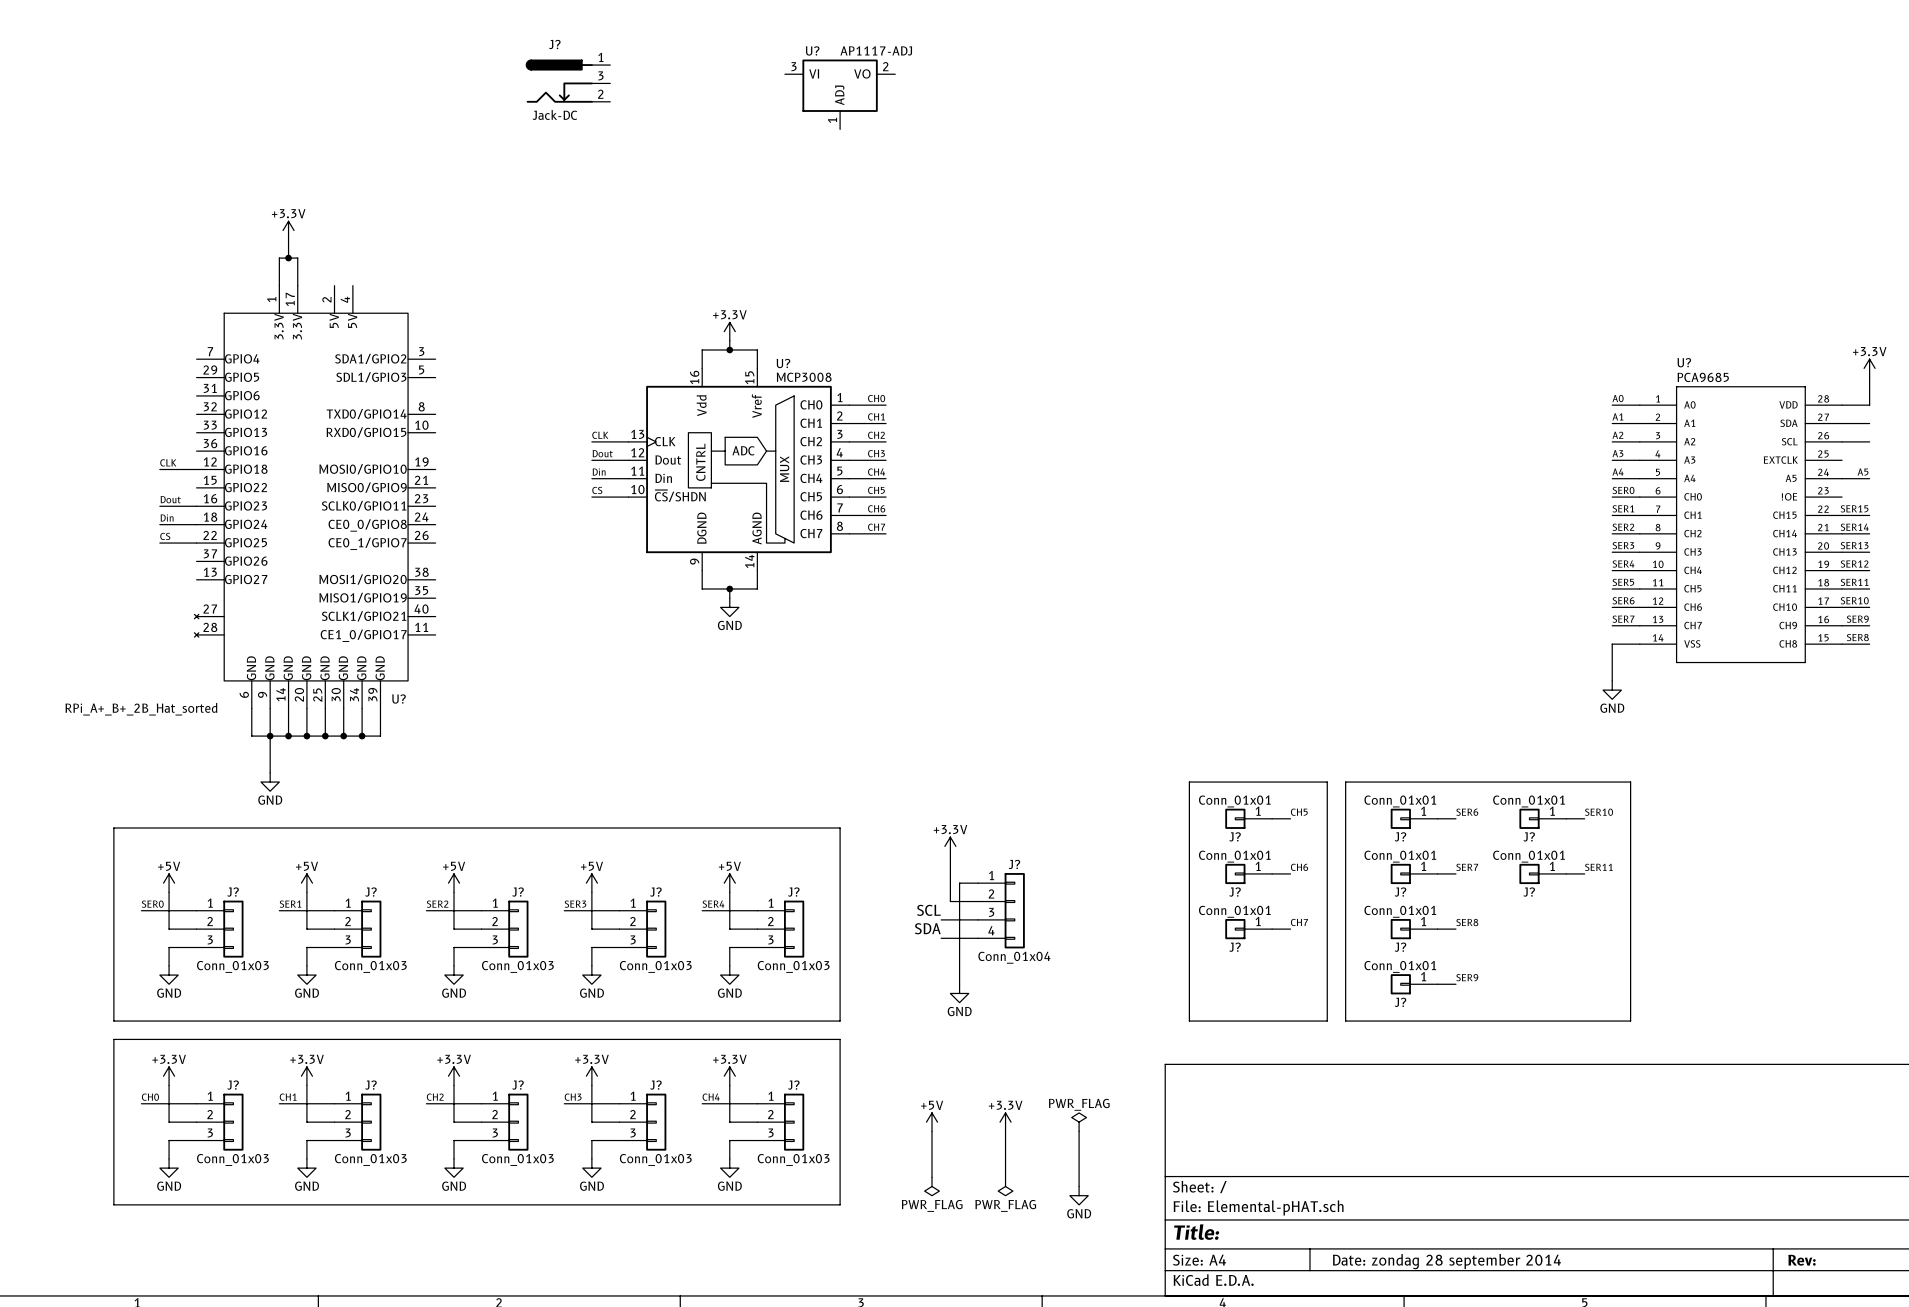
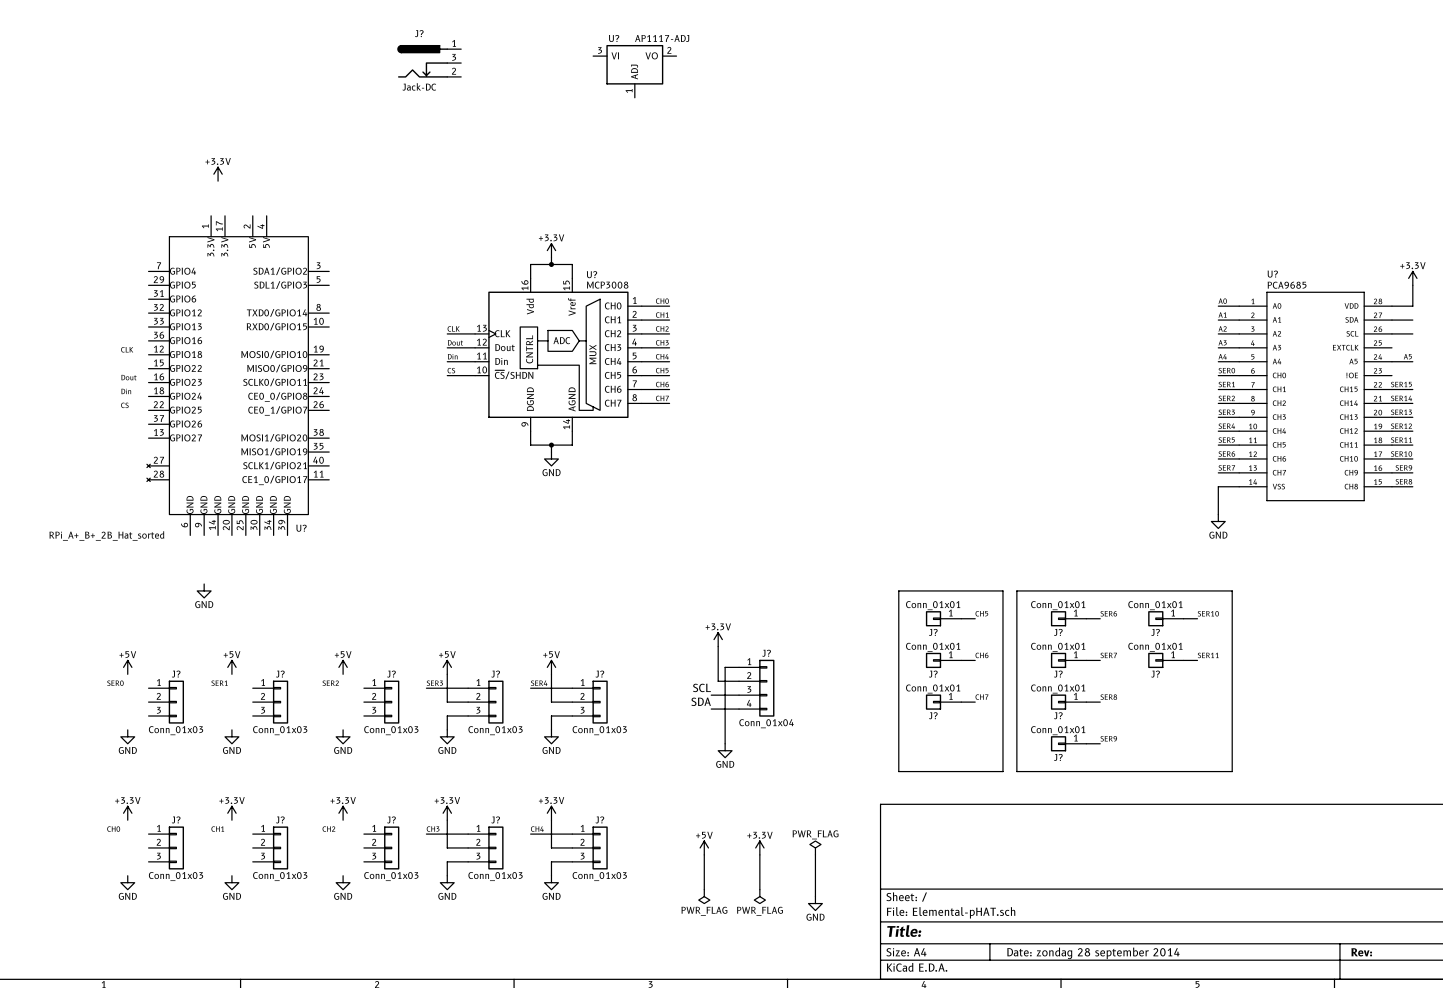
wire: (288, 239) (288, 258) -> none
junction: (288, 258) -> none
wire: (279, 285) (279, 258) (297, 258) (297, 285) -> none
wire: (159, 469) (196, 469) -> none
wire: (159, 506) (196, 506) -> none
wire: (159, 524) (196, 524) -> none
wire: (159, 543) (196, 543) -> none
wire: (251, 708) (251, 736) (380, 736) (380, 708) -> none
wire: (270, 708) (270, 772) -> none
wire: (288, 708) (288, 736) -> none
wire: (306, 708) (306, 736) -> none
wire: (325, 708) (325, 736) -> none
wire: (343, 708) (343, 736) -> none
wire: (362, 708) (362, 736) -> none
junction: (270, 736) -> none
junction: (288, 736) -> none
junction: (306, 736) -> none
junction: (325, 736) -> none
junction: (343, 736) -> none
junction: (362, 736) -> none
bus: (113, 827) (113, 1021) (840, 1021) (840, 827) (113, 827) -> none
wire: (169, 892) (169, 929) (196, 929) -> none
wire: (306, 892) (306, 929) (334, 929) -> none
wire: (454, 892) (454, 929) (481, 929) -> none
wire: (141, 910) (196, 910) -> none
wire: (279, 910) (334, 910) -> none
wire: (426, 910) (481, 910) -> none
wire: (196, 947) (169, 947) (169, 965) -> none
wire: (334, 947) (306, 947) (306, 965) -> none
wire: (481, 947) (454, 947) (454, 965) -> none
bus: (113, 1039) (113, 1204) (840, 1204) (840, 1039) (113, 1039) -> none
wire: (169, 1085) (169, 1122) (196, 1122) -> none
wire: (306, 1085) (306, 1122) (334, 1122) -> none
wire: (454, 1085) (454, 1122) (481, 1122) -> none
wire: (141, 1103) (196, 1103) -> none
wire: (279, 1103) (334, 1103) -> none
wire: (426, 1103) (481, 1103) -> none
wire: (196, 1140) (169, 1140) (169, 1158) -> none
wire: (334, 1140) (306, 1140) (306, 1158) -> none
wire: (481, 1140) (454, 1140) (454, 1158) -> none

